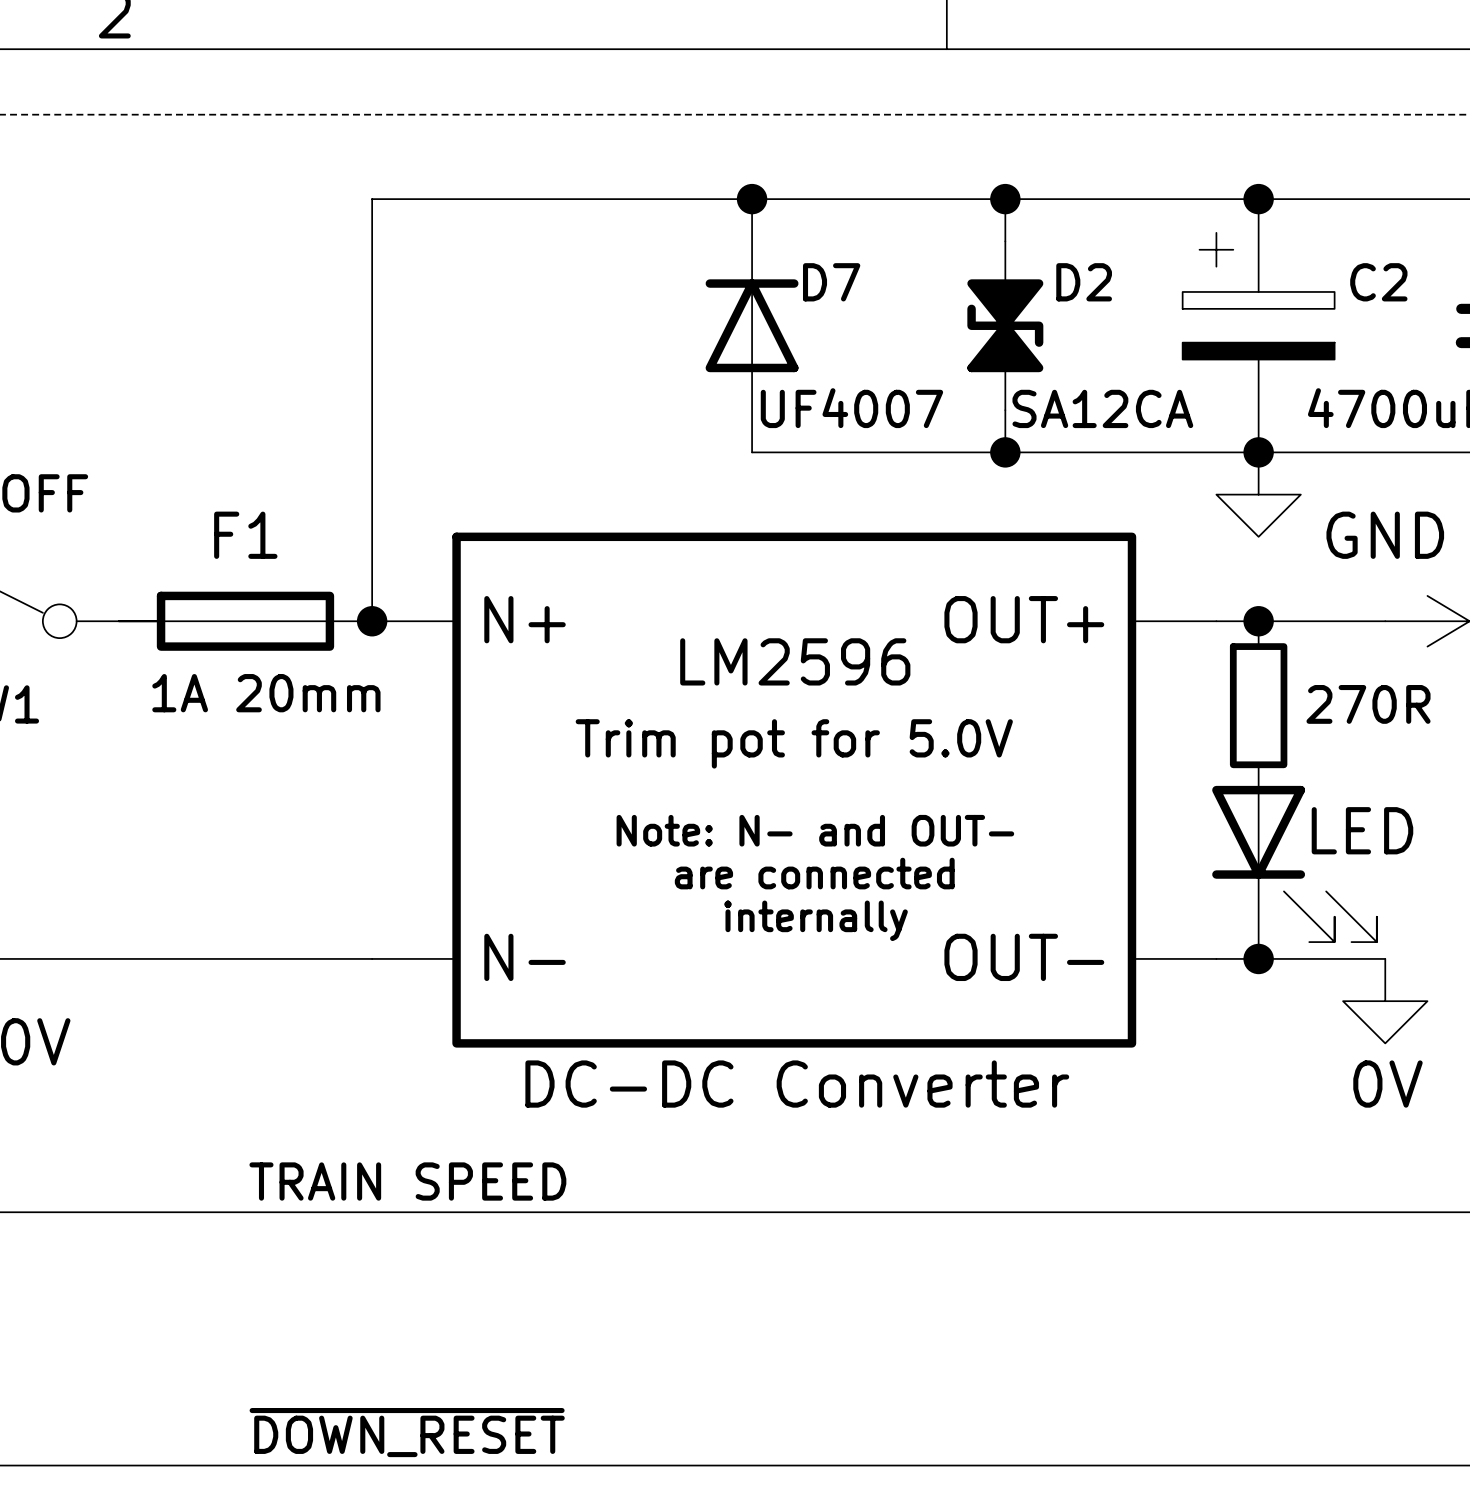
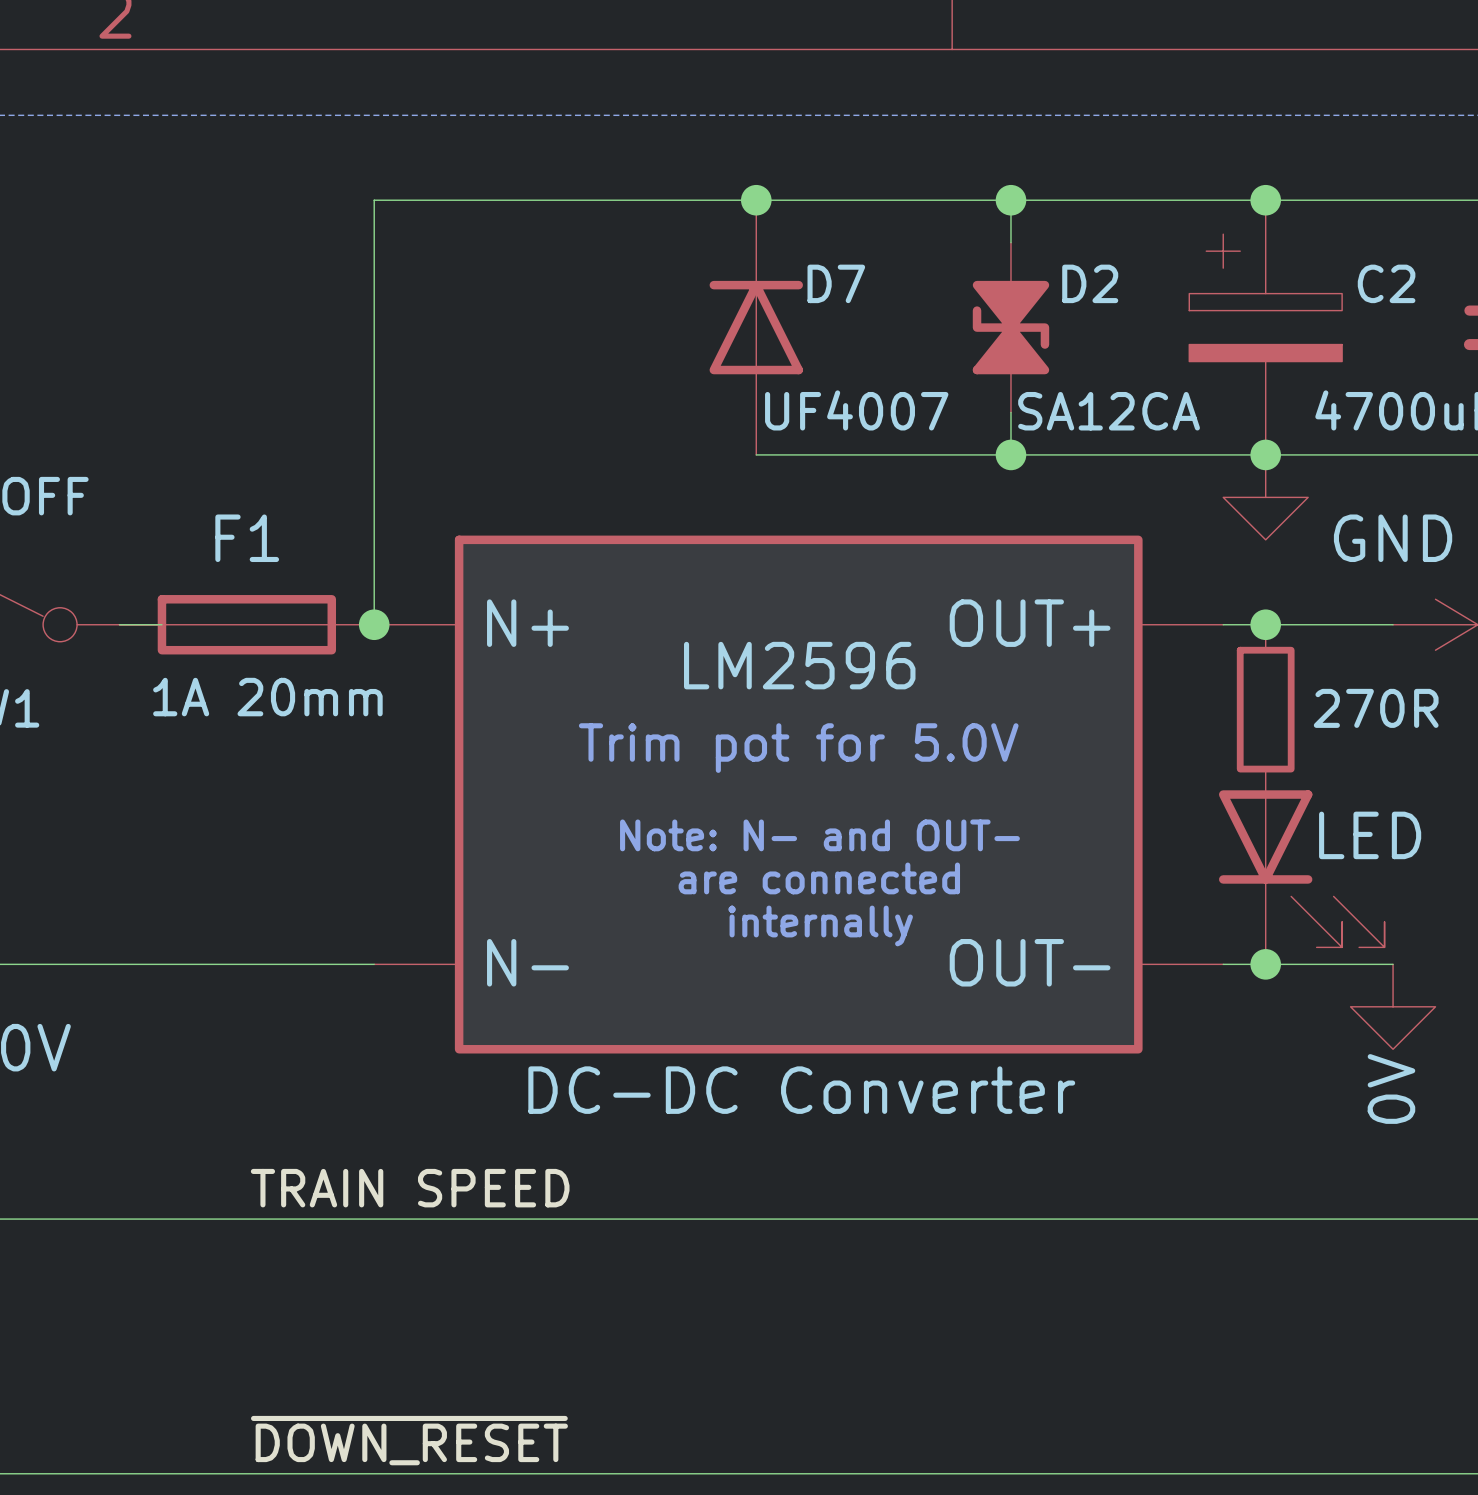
power symbol text rotation: 0° (1387, 1084) -> 90° counterclockwise (1391, 1088)

